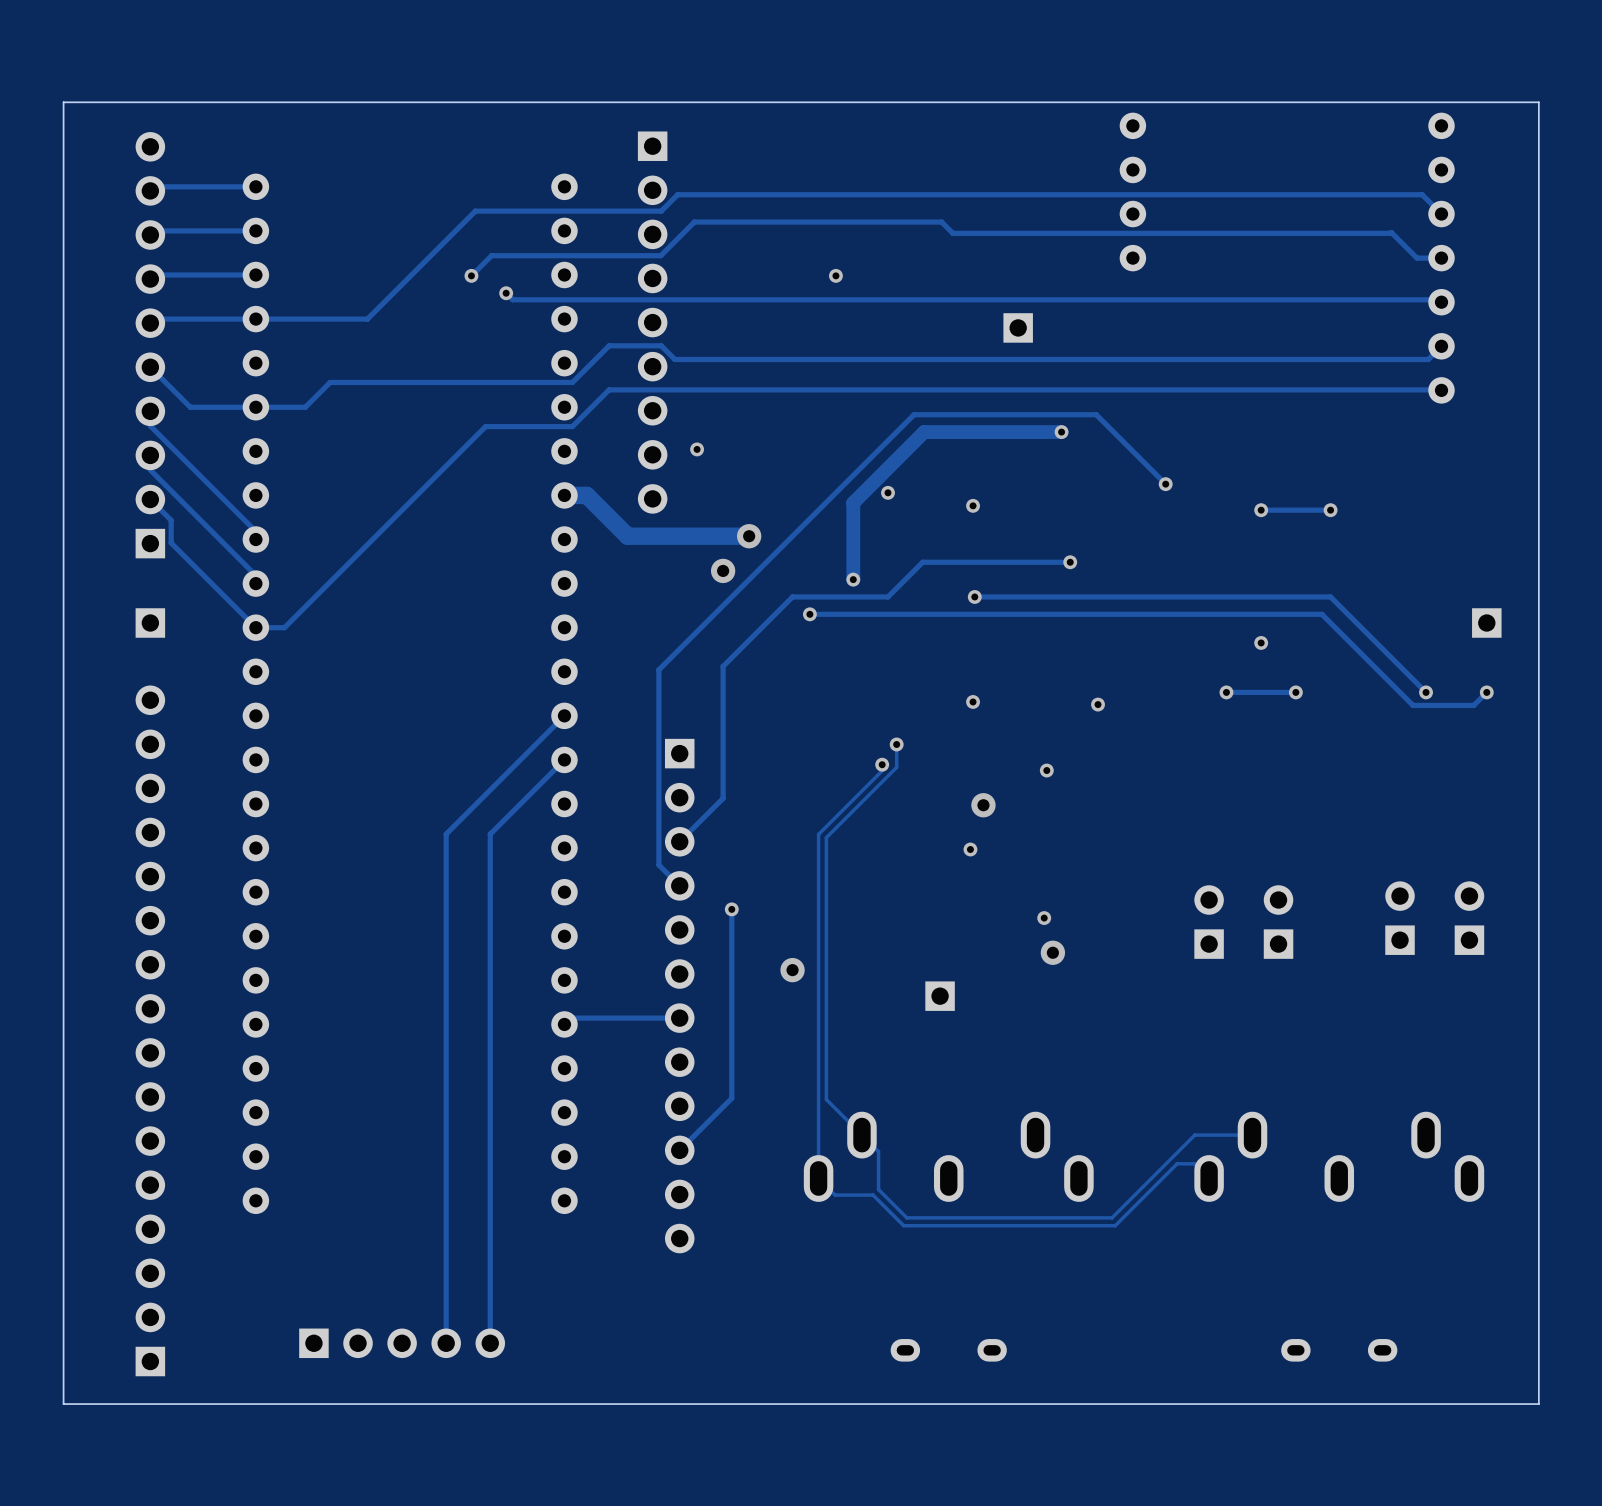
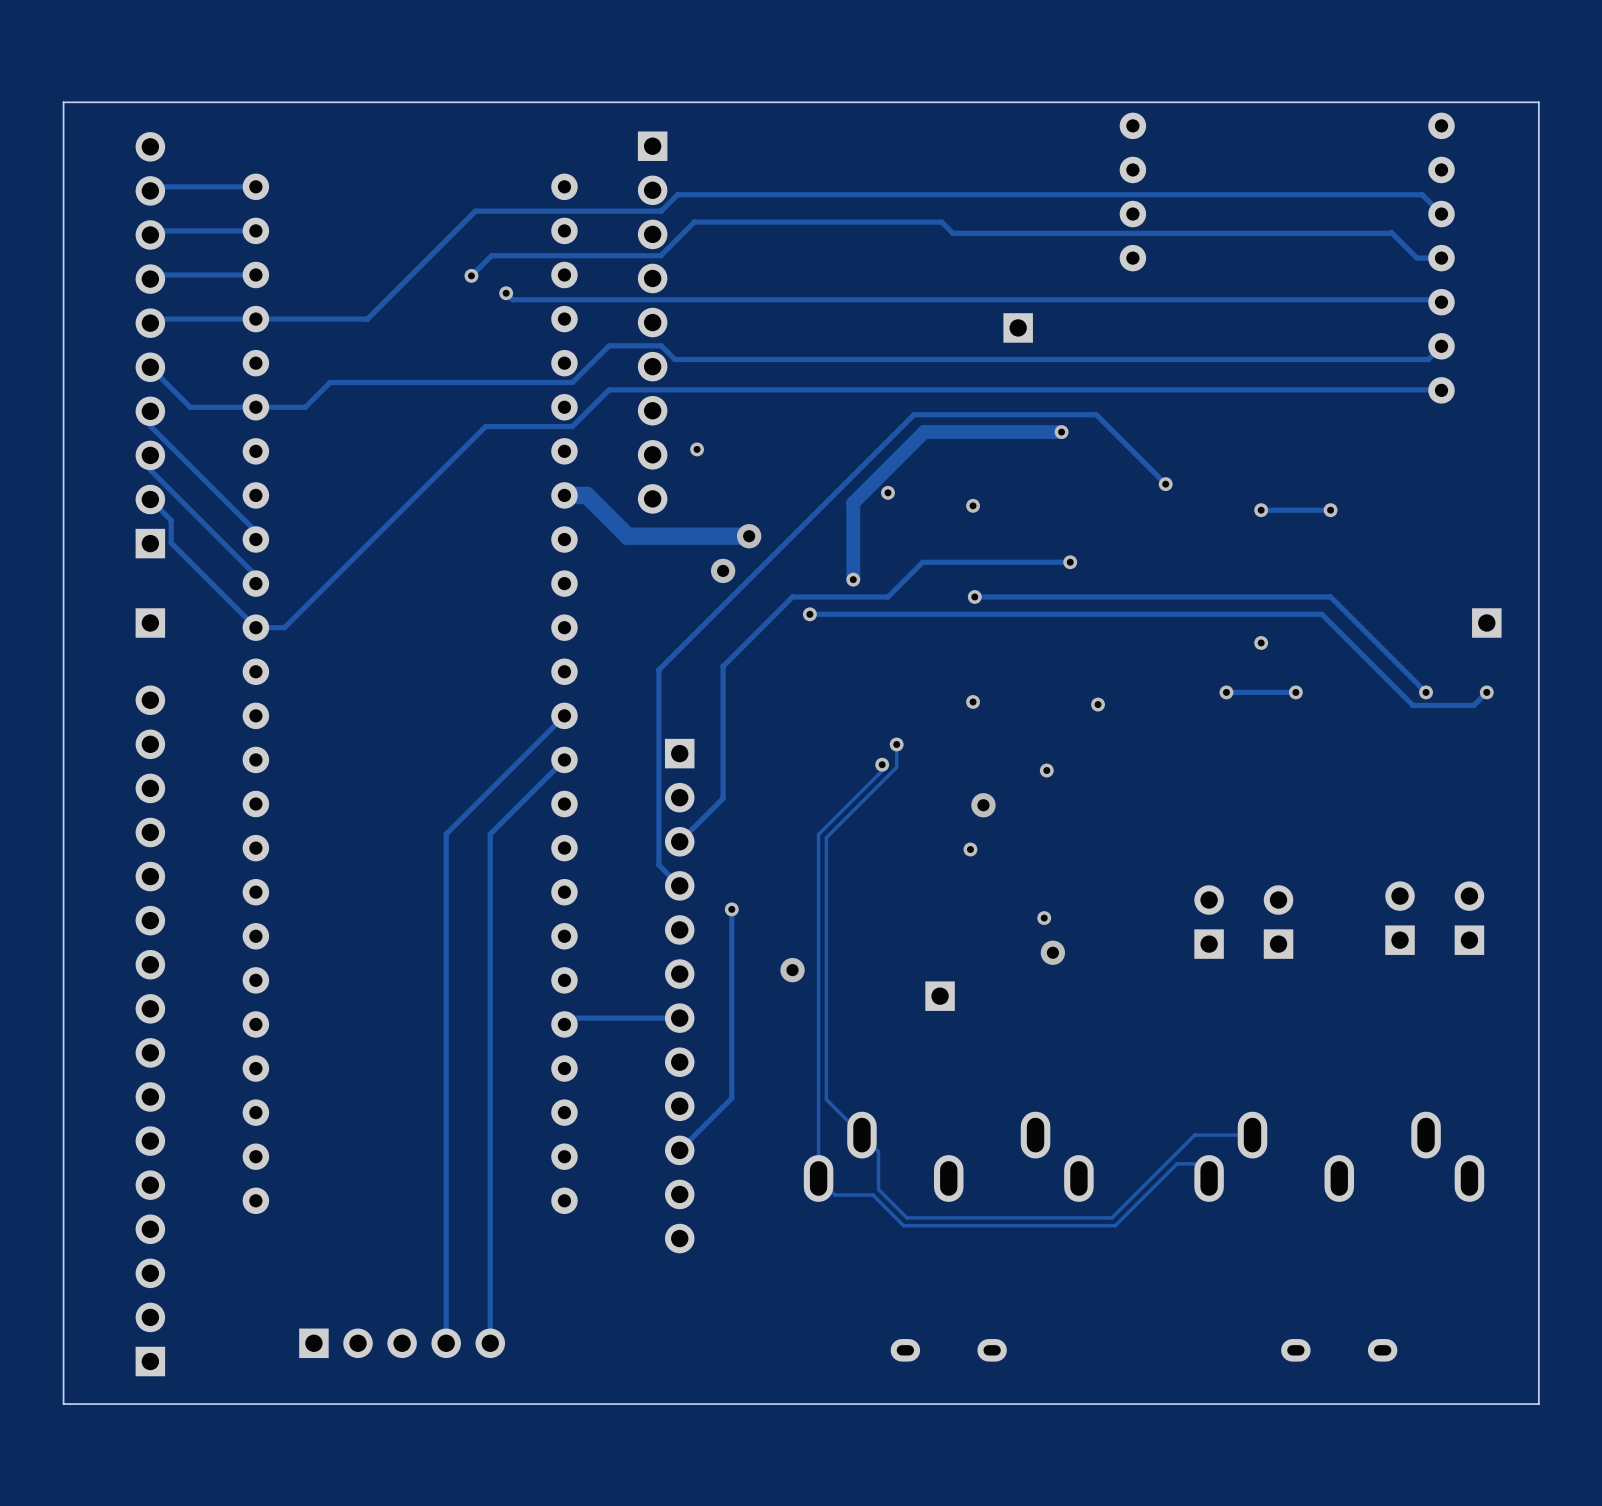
via: (835, 275) -> none

